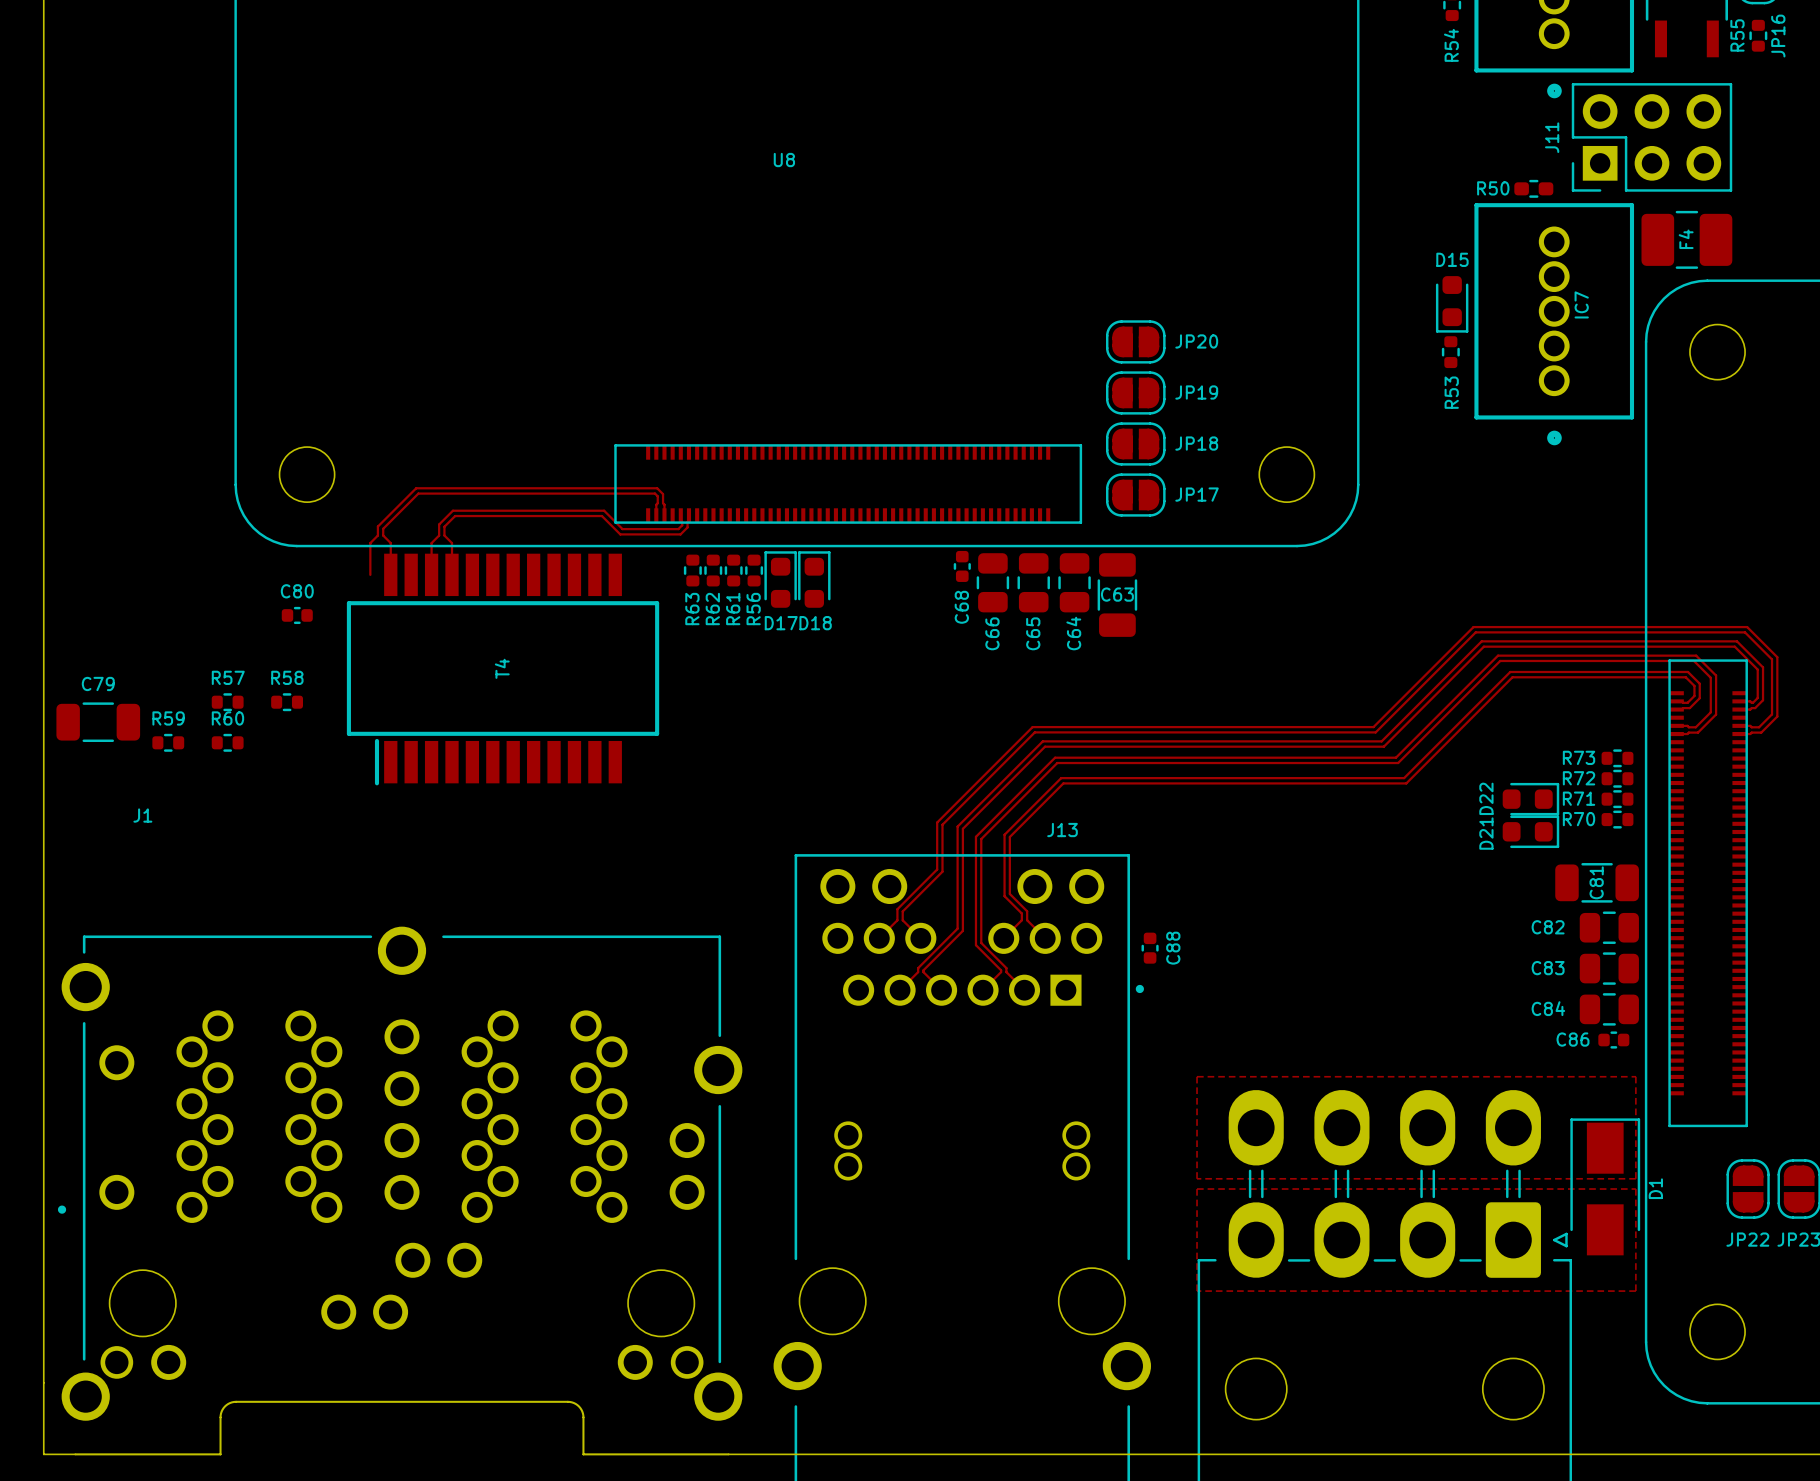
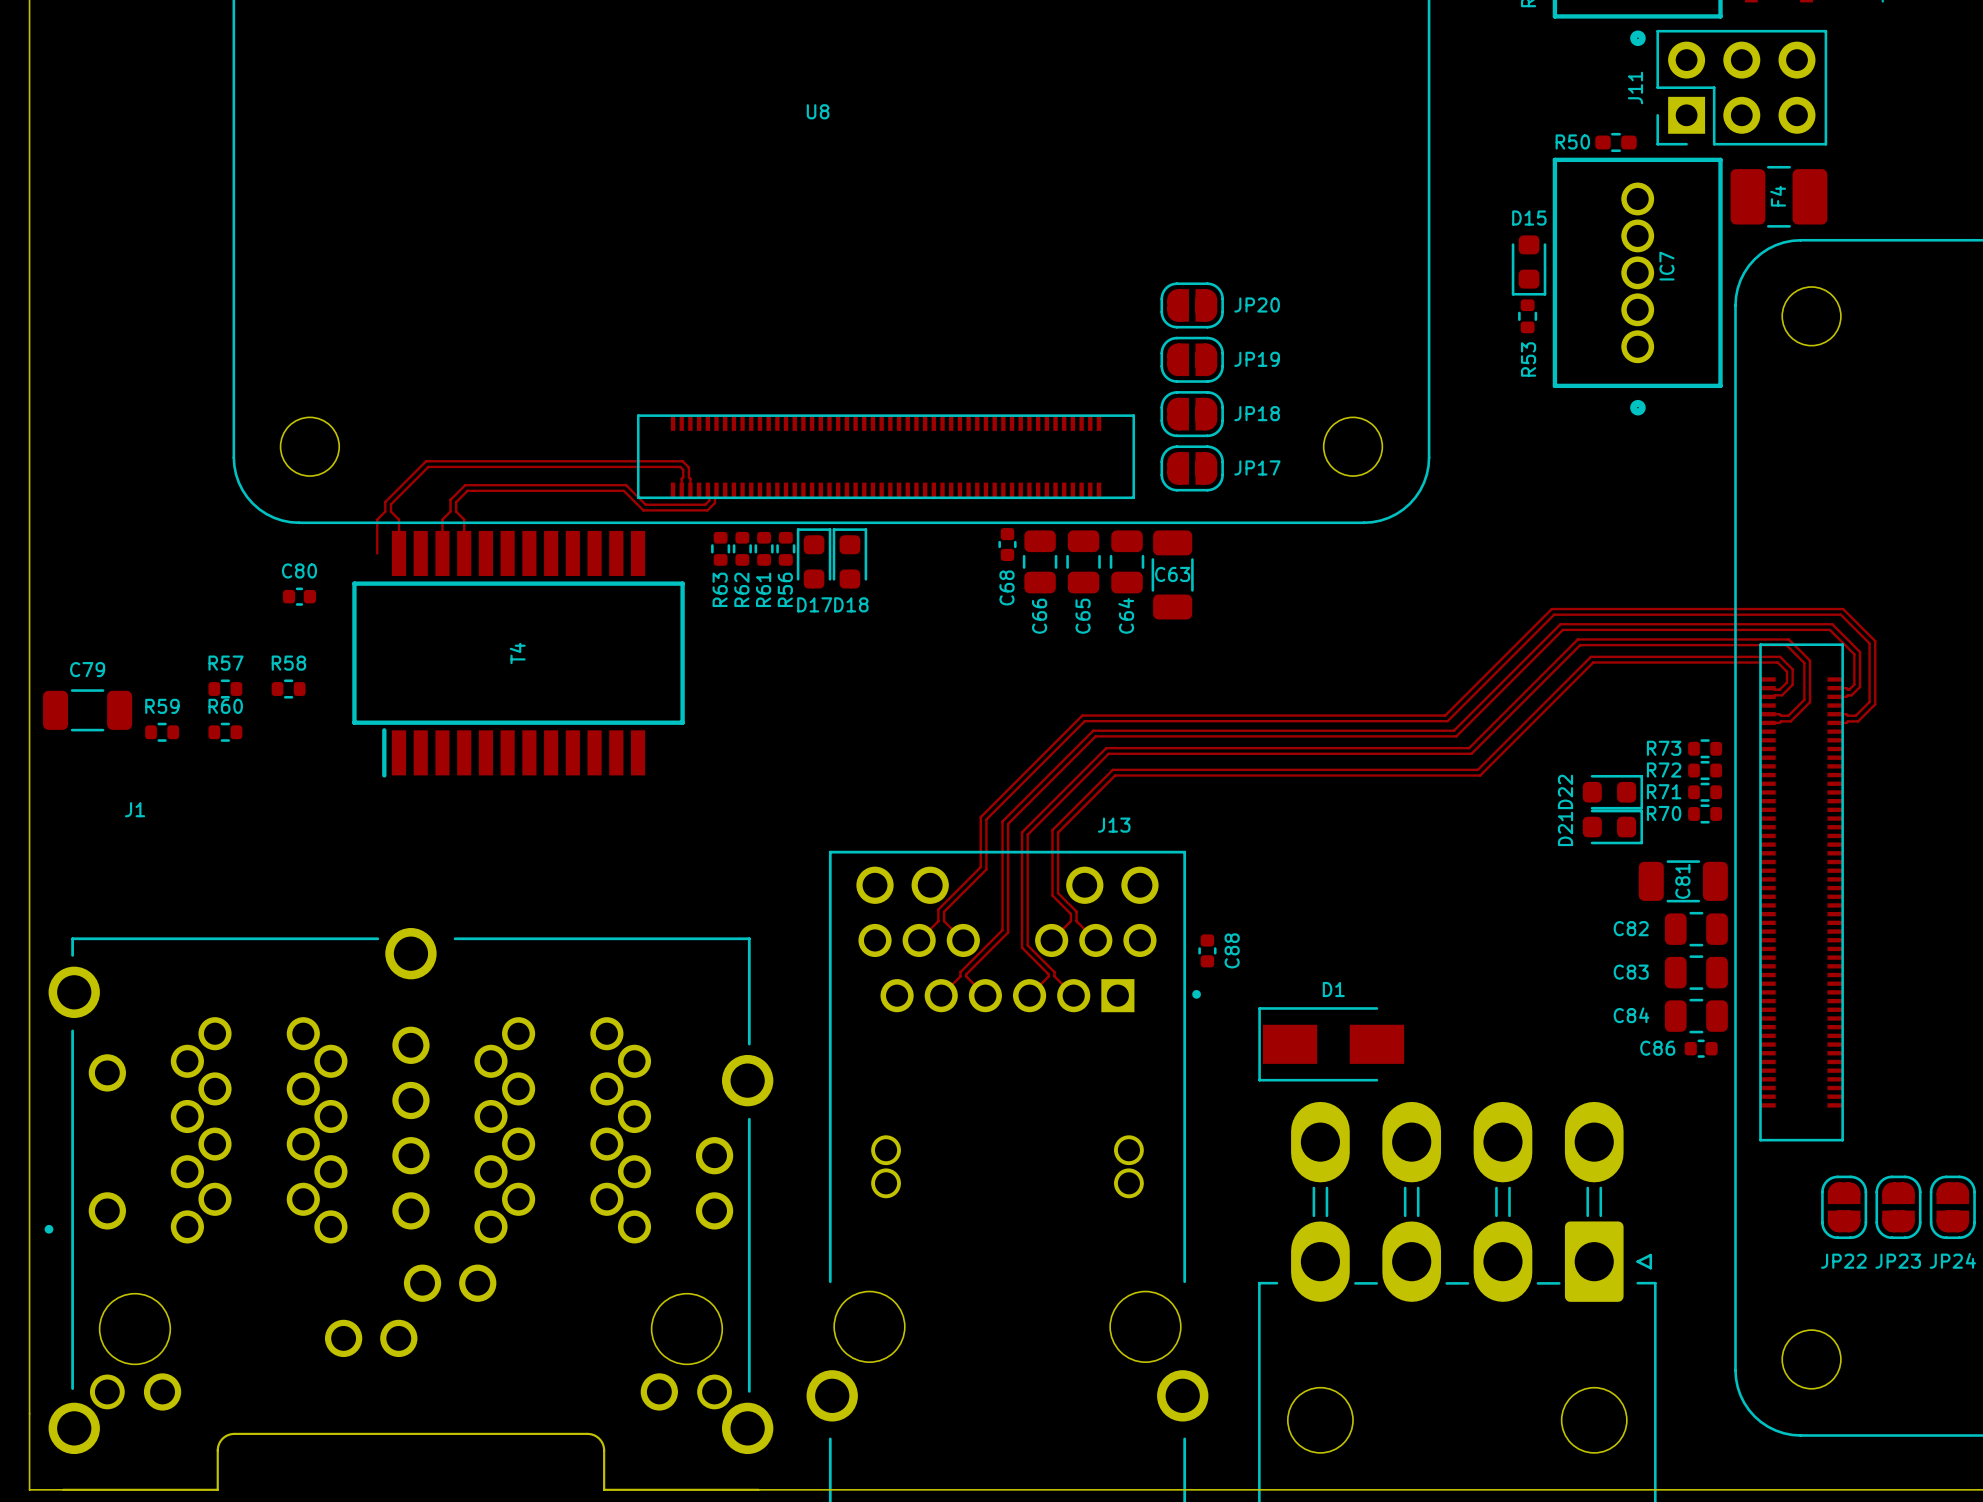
top zone outline: (1197, 1076) (1197, 1178) (1635, 1178) (1635, 1076) (1197, 1076) -> none
D1 rotation: 0° (1605, 1186) -> 90° counterclockwise (1331, 1044)
D1 position: (1605, 1186) -> (1331, 1044)
top zone outline: (1197, 1189) (1197, 1291) (1635, 1291) (1635, 1189) (1197, 1189) -> none

